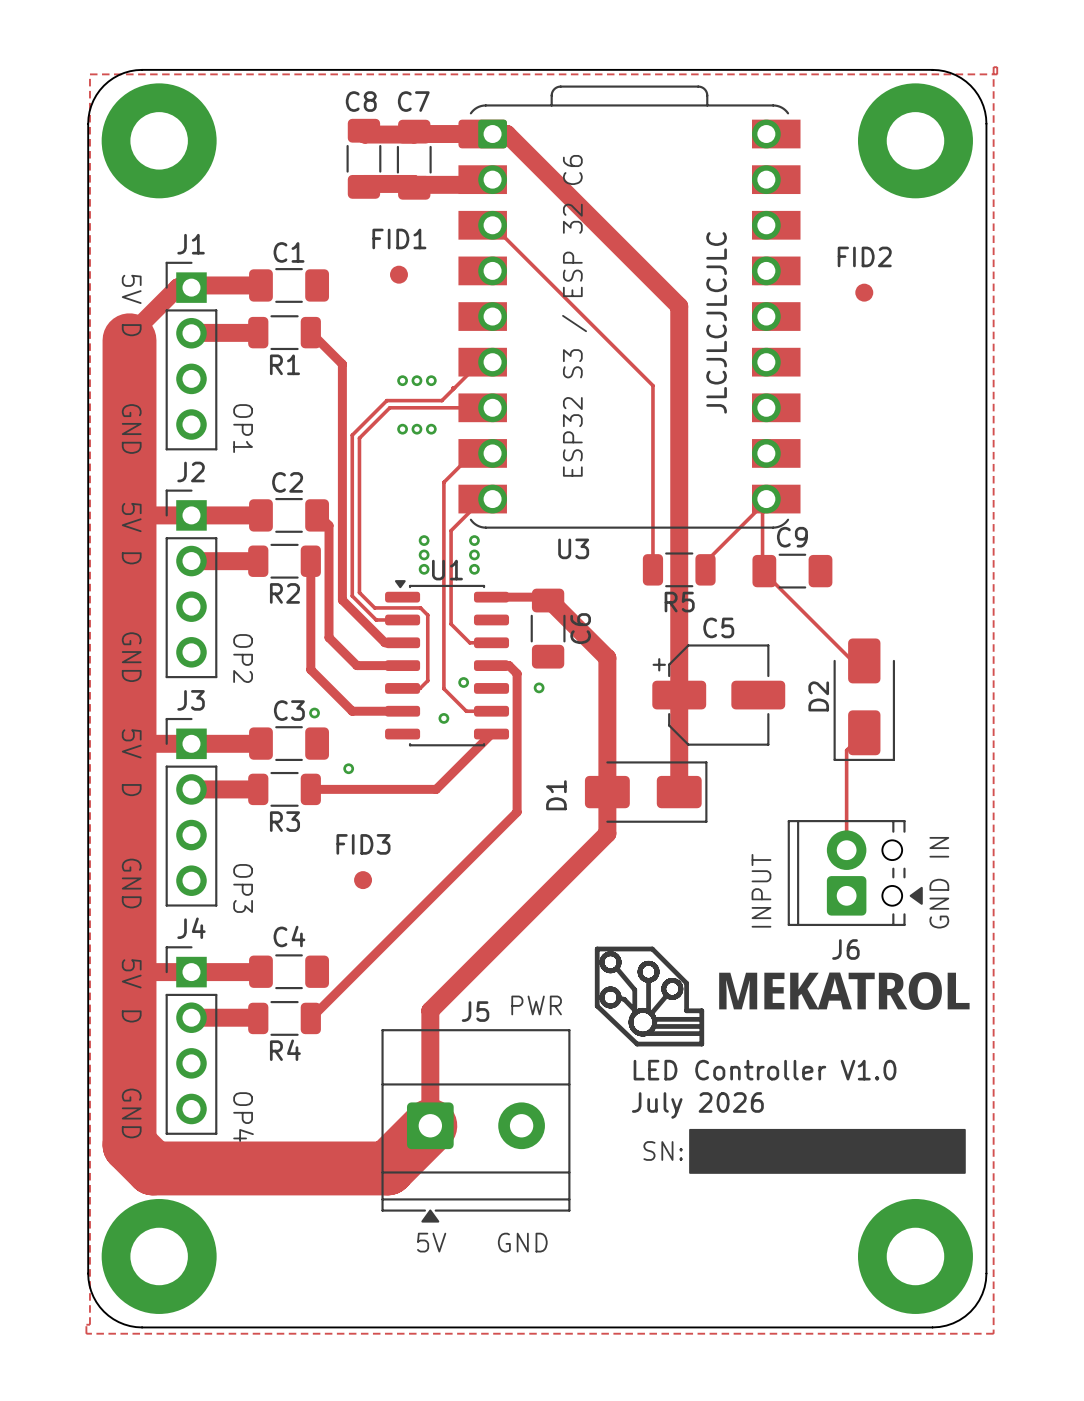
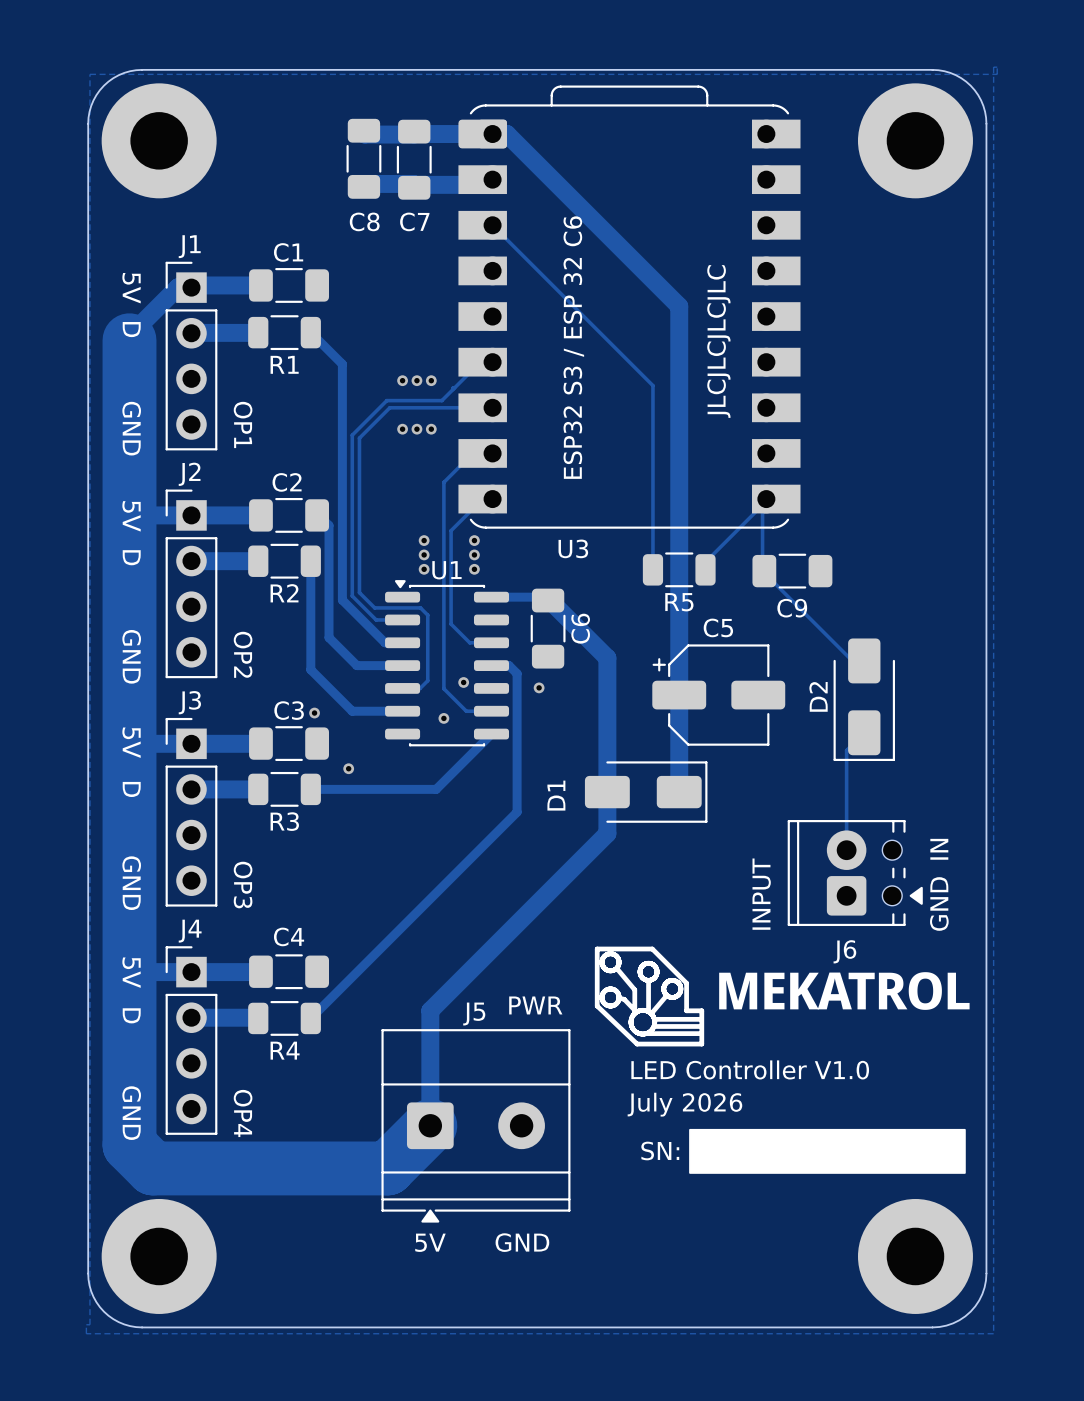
C8 name position: C8 (361, 101) -> C8 (364, 221)
C7 name position: C7 (413, 101) -> C7 (414, 221)
FID1: (398, 274) -> none
FID2: (864, 292) -> none
C9 name position: C9 (792, 537) -> C9 (792, 608)
FID3: (363, 880) -> none

